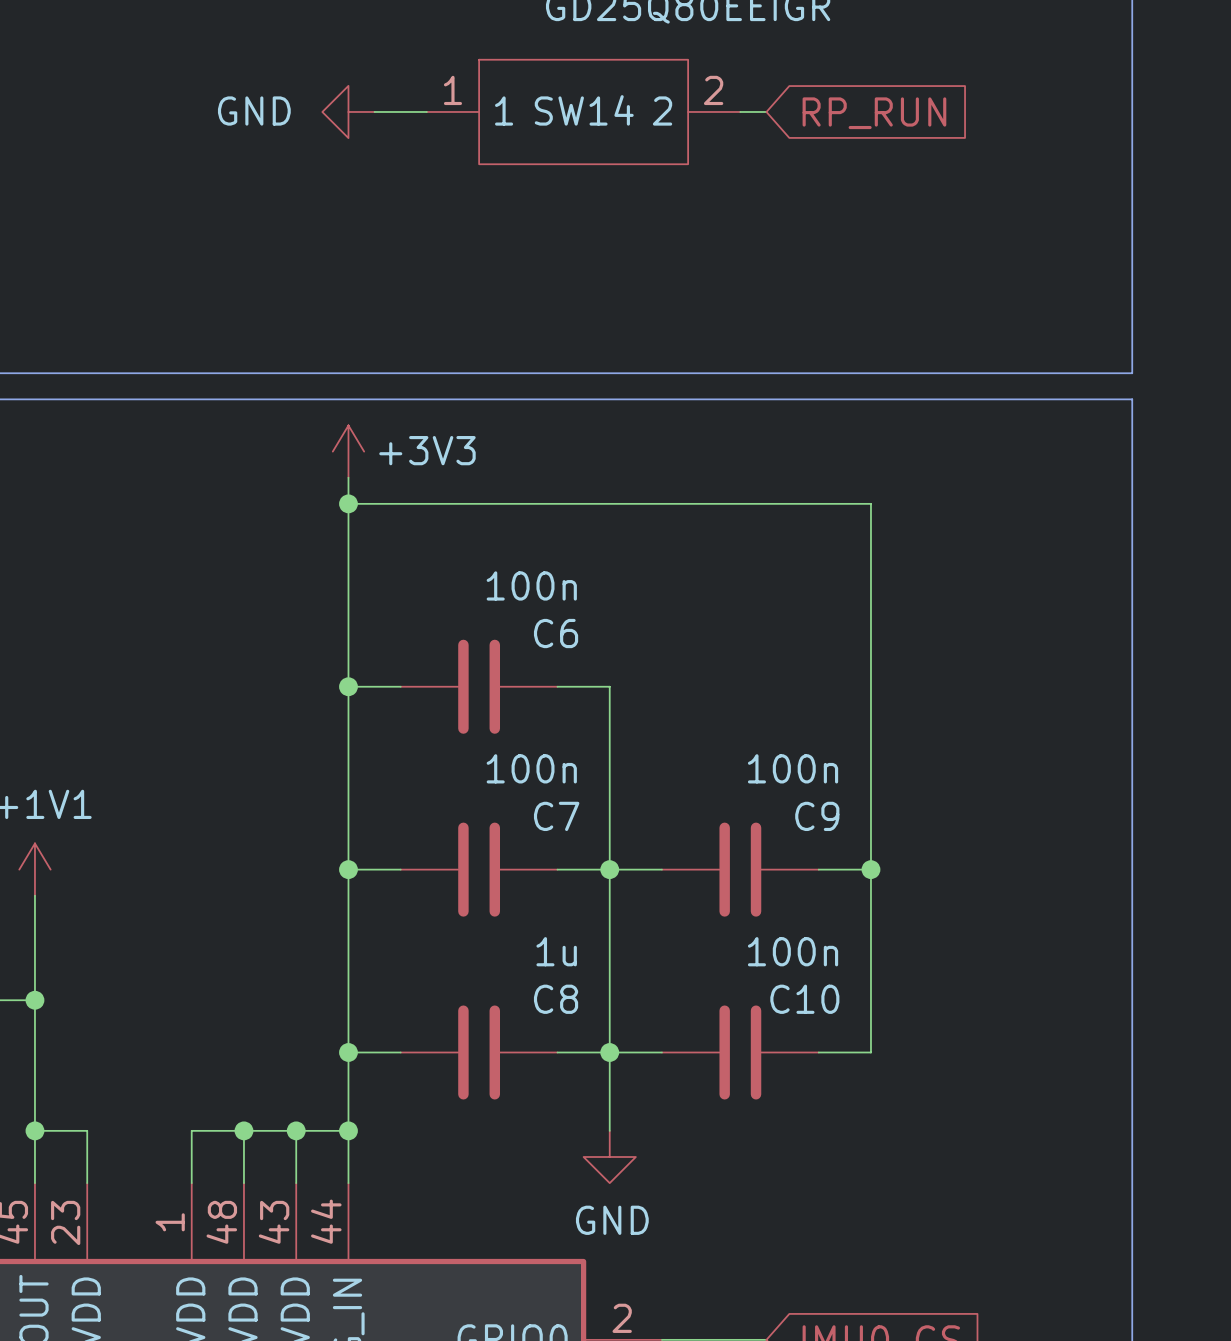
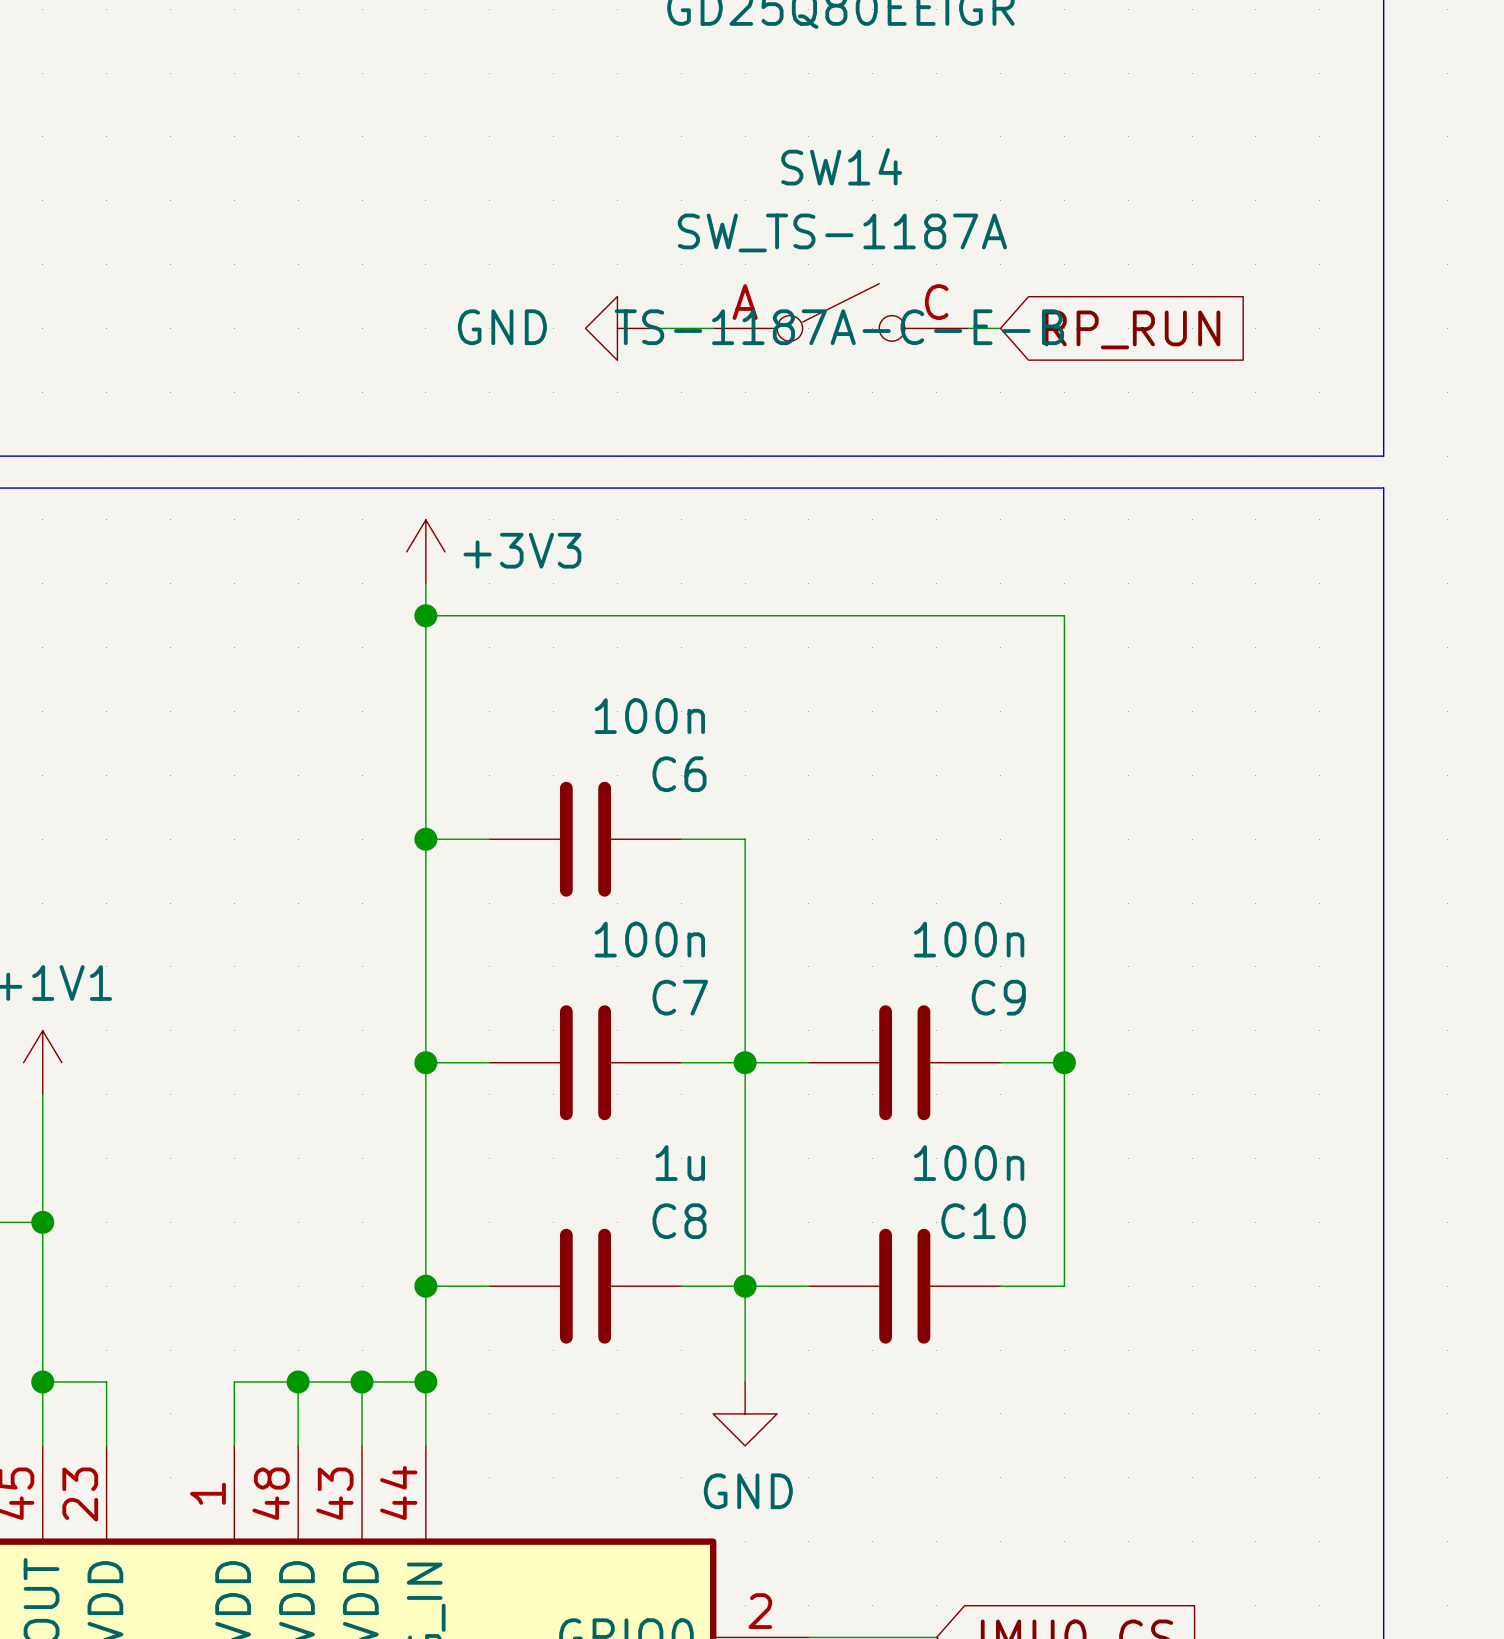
SW14 symbol: [426, 59, 741, 165] -> [713, 283, 969, 342]
SW14 name position: SW14 (584, 110) -> SW14 (841, 166)
power symbol position: GND (348, 111) -> GND (617, 328)
wire: (374, 111) (426, 111) -> (649, 328) (713, 328)
wire: (740, 111) (766, 111) -> (968, 328) (1000, 328)
global label position: RP_RUN (874, 113) -> RP_RUN (1132, 329)
SW14 value: none -> SW_TS-1187A (842, 232)
SW14 text: none -> TS-1187A-C-E-B (839, 327)

